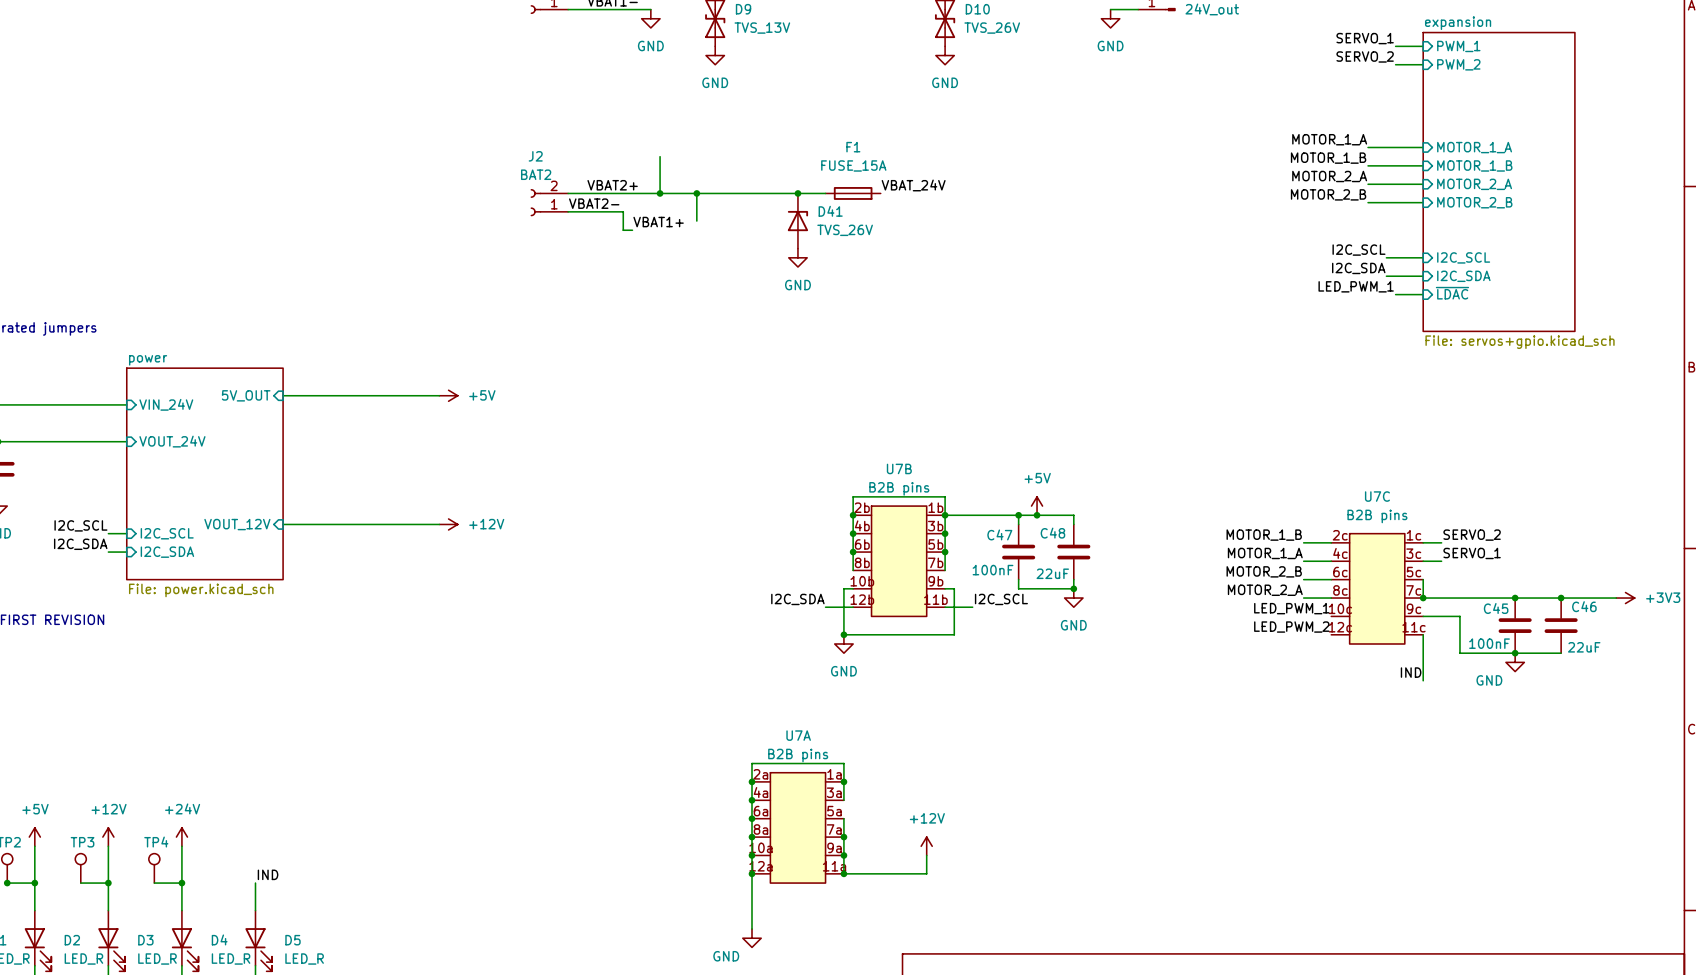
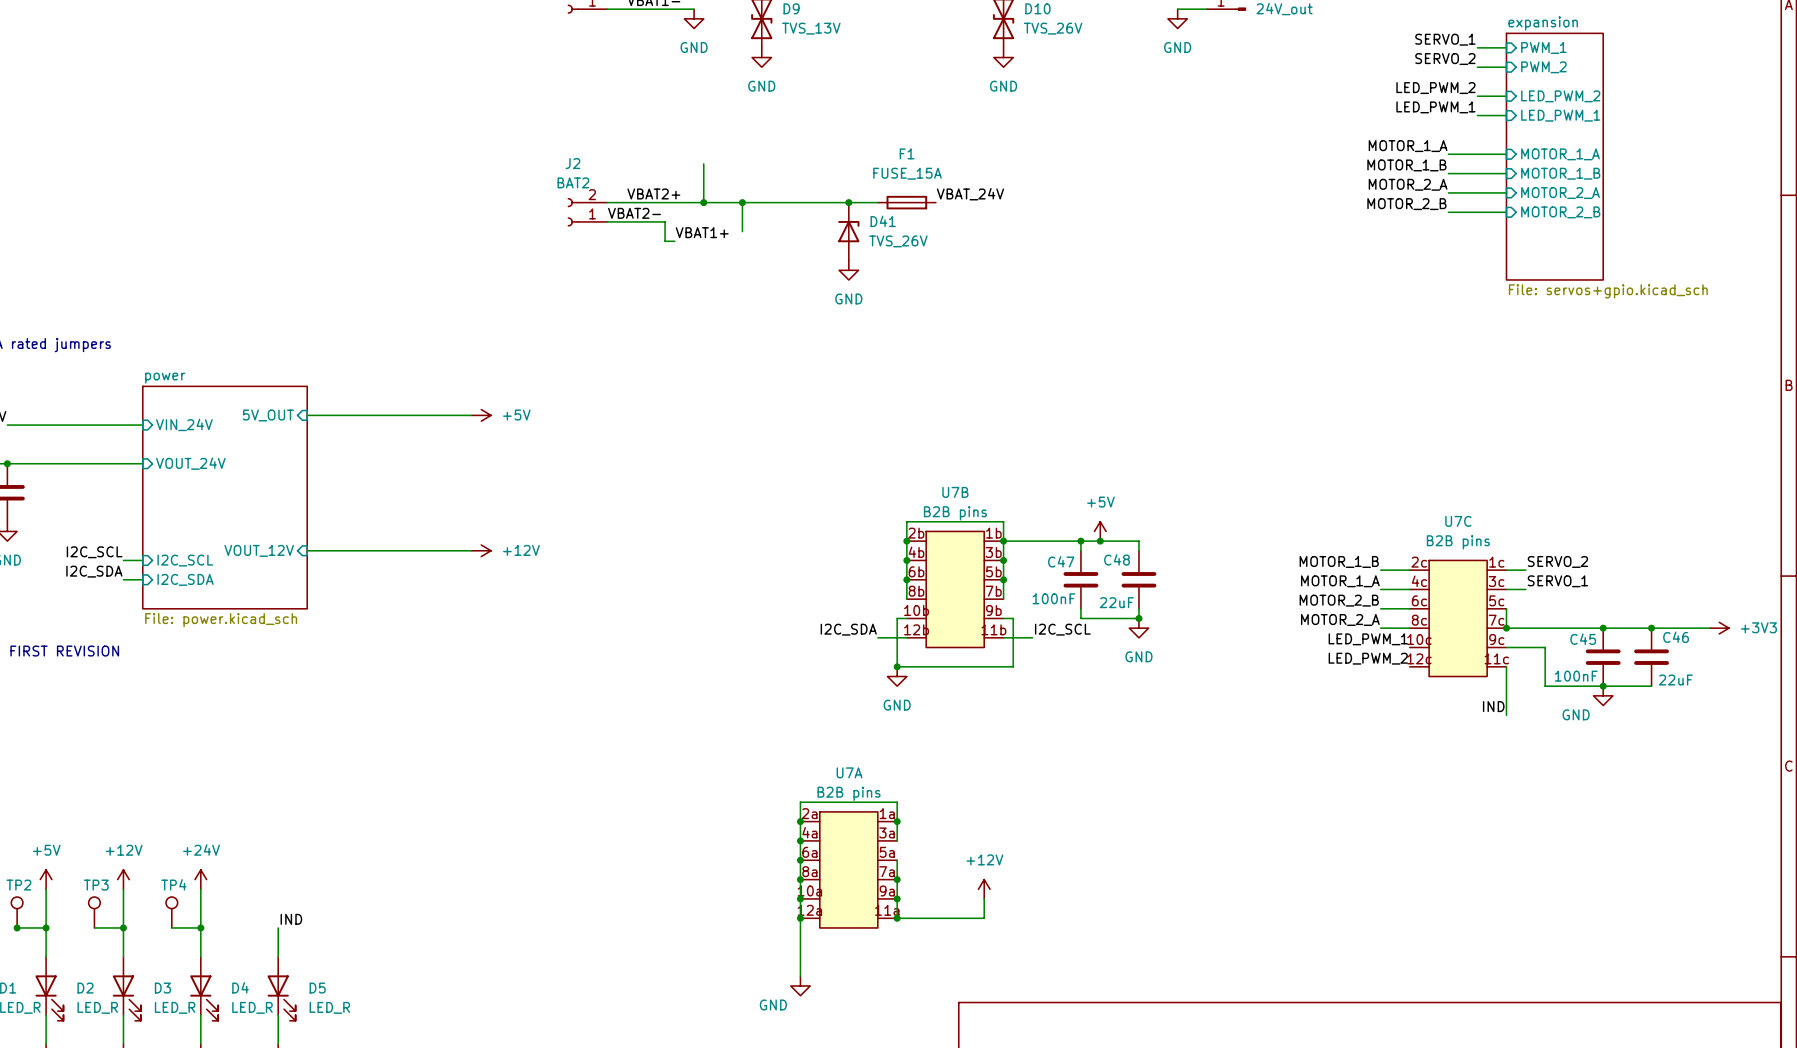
label: none -> LED_PWM_2 (1435, 88)
wire: none -> (1477, 96) (1506, 96)
sheet pin: none -> LED_PWM_2 (1560, 96)
label: none -> LED_PWM_1 (1435, 107)
wire: none -> (1477, 115) (1506, 115)
sheet pin: none -> LED_PWM_1 (1560, 115)
sheet expansion: none -> File: servos+gpio.kicad_sch (1554, 156)
sheet expansion: File: servos+gpio.kicad_sch (1499, 181) -> none
label: I2C_SCL (1358, 250) -> none
wire: (1386, 257) (1423, 257) -> none
sheet pin: I2C_SCL (1463, 257) -> none
label: I2C_SDA (1358, 268) -> none
wire: (1386, 276) (1423, 276) -> none
sheet pin: I2C_SDA (1463, 276) -> none
label: LED_PWM_1 (1356, 286) -> none
sheet pin: ~{LDAC} (1452, 293) -> none
wire: (1395, 294) (1423, 294) -> none

